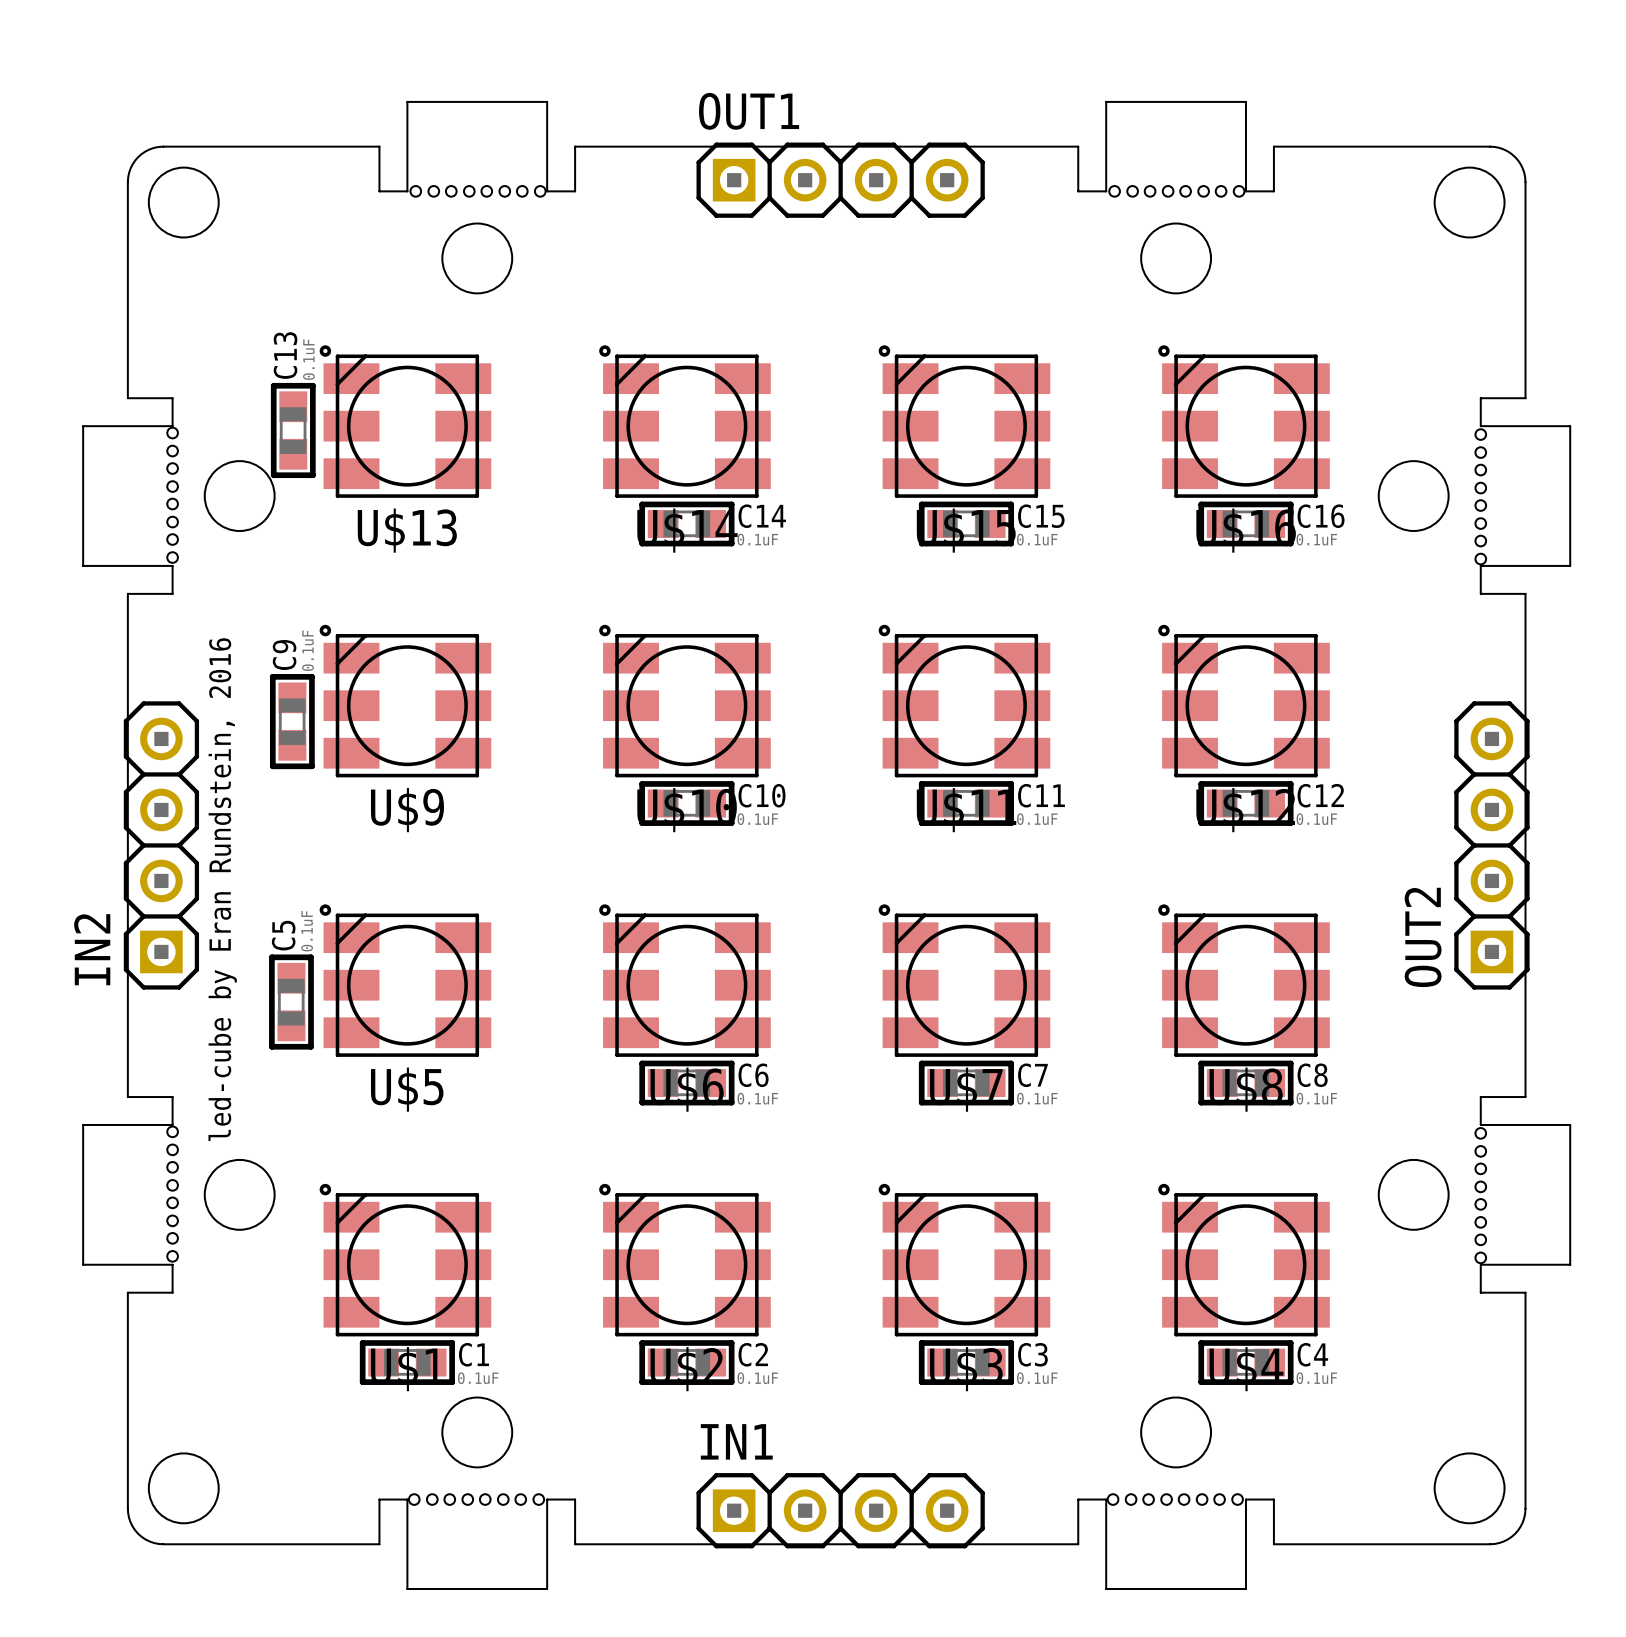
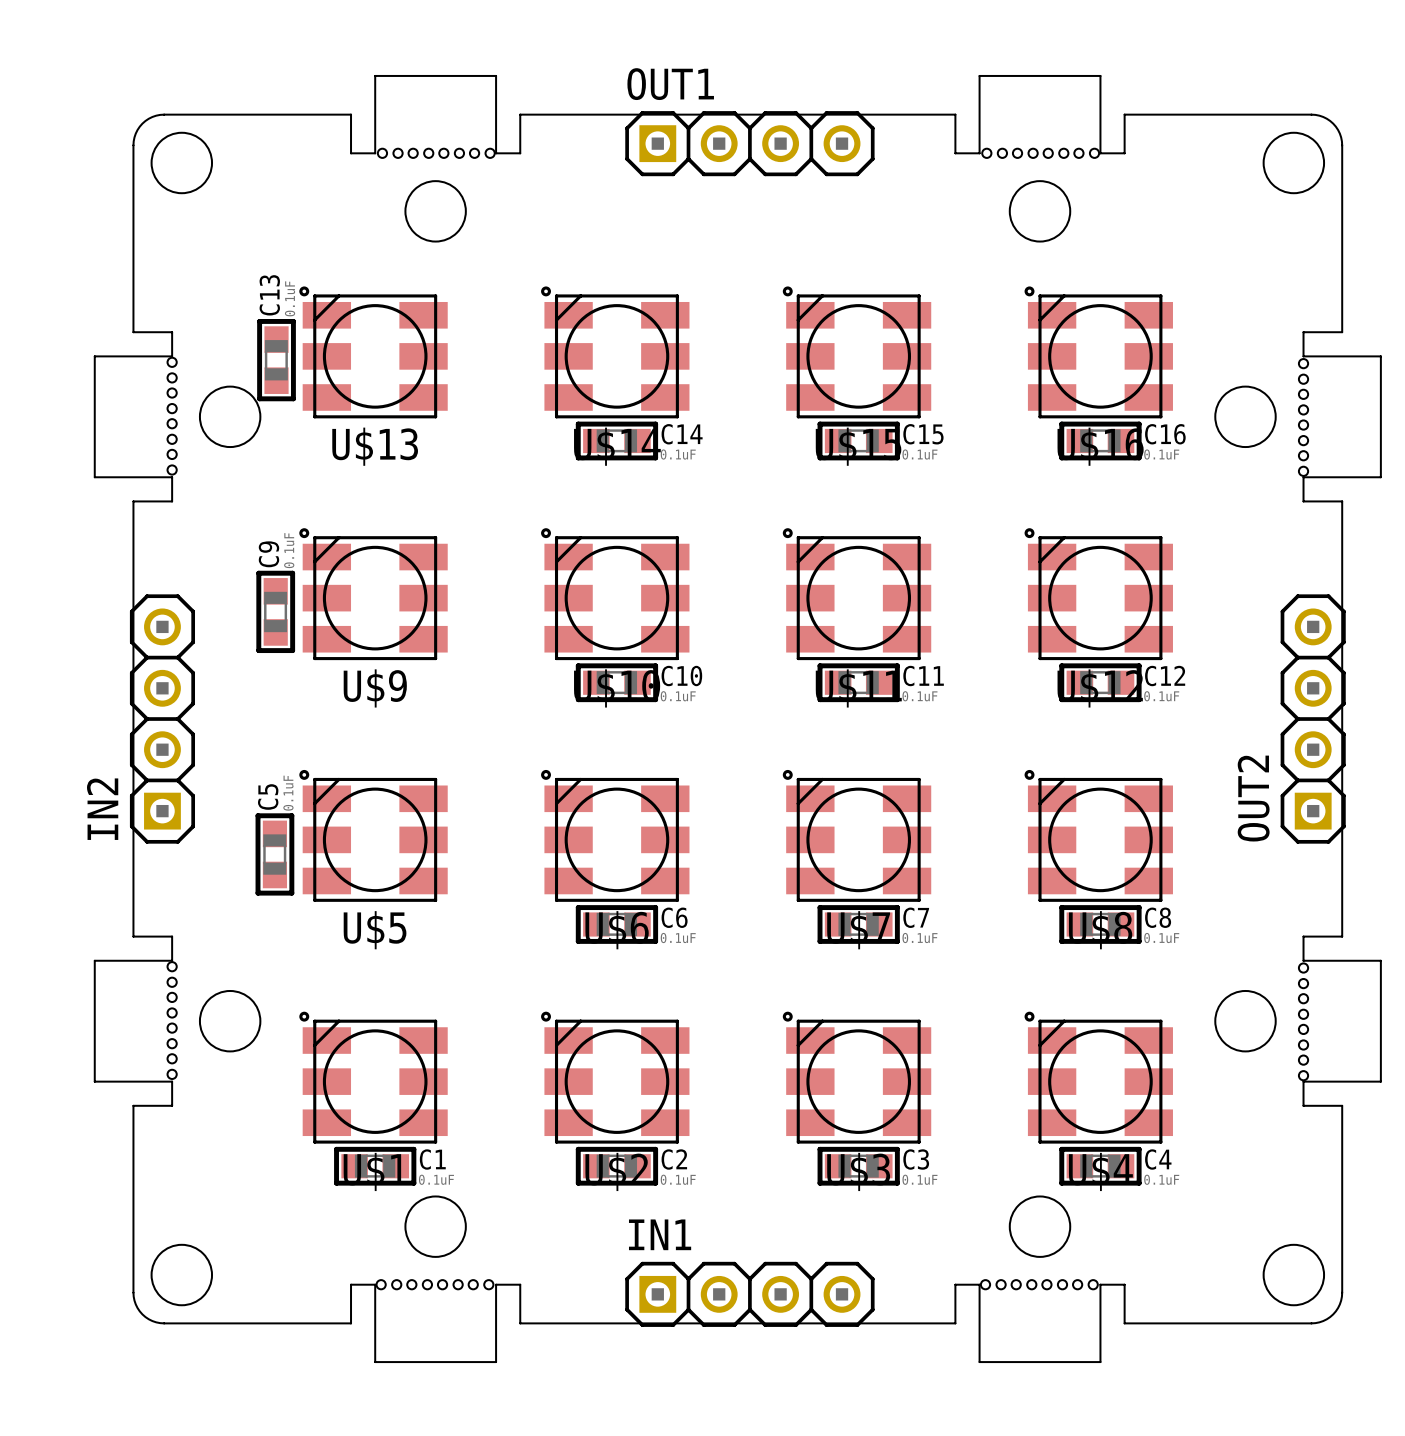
text: led-cube by Eran Rundstein, 2016 (222, 889) -> none

